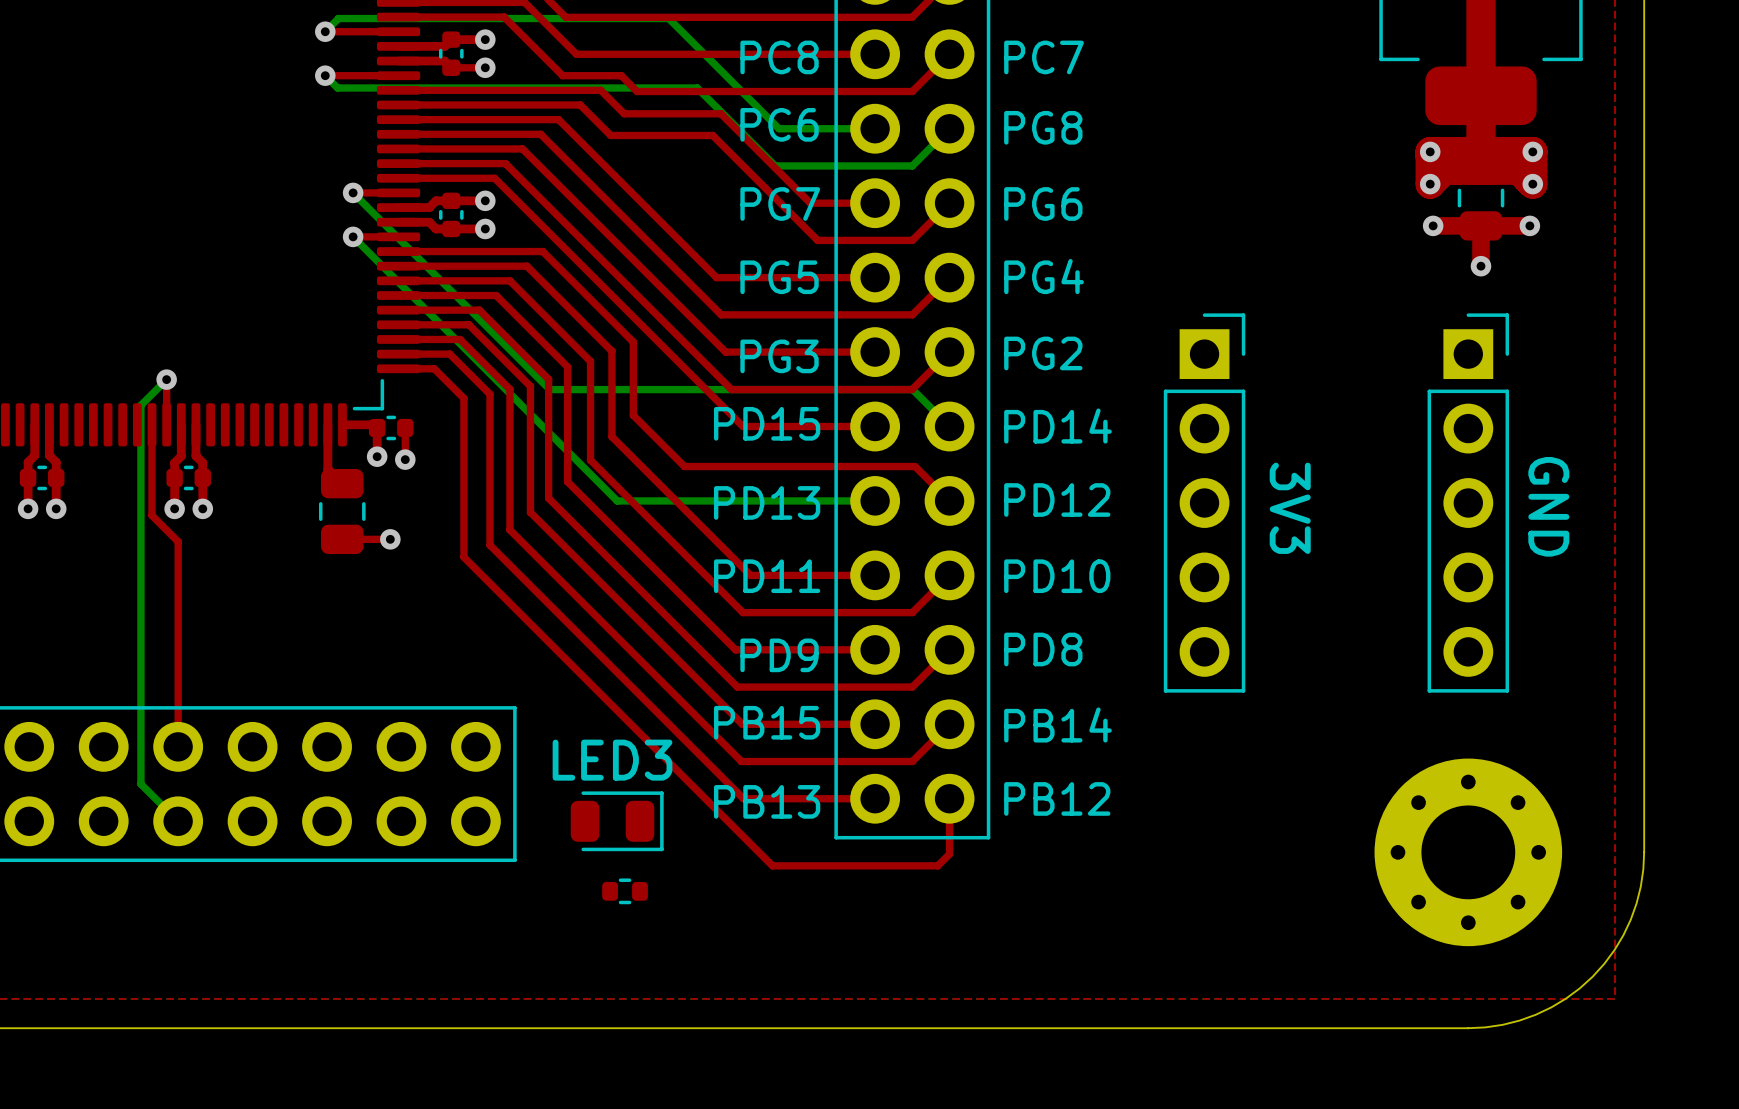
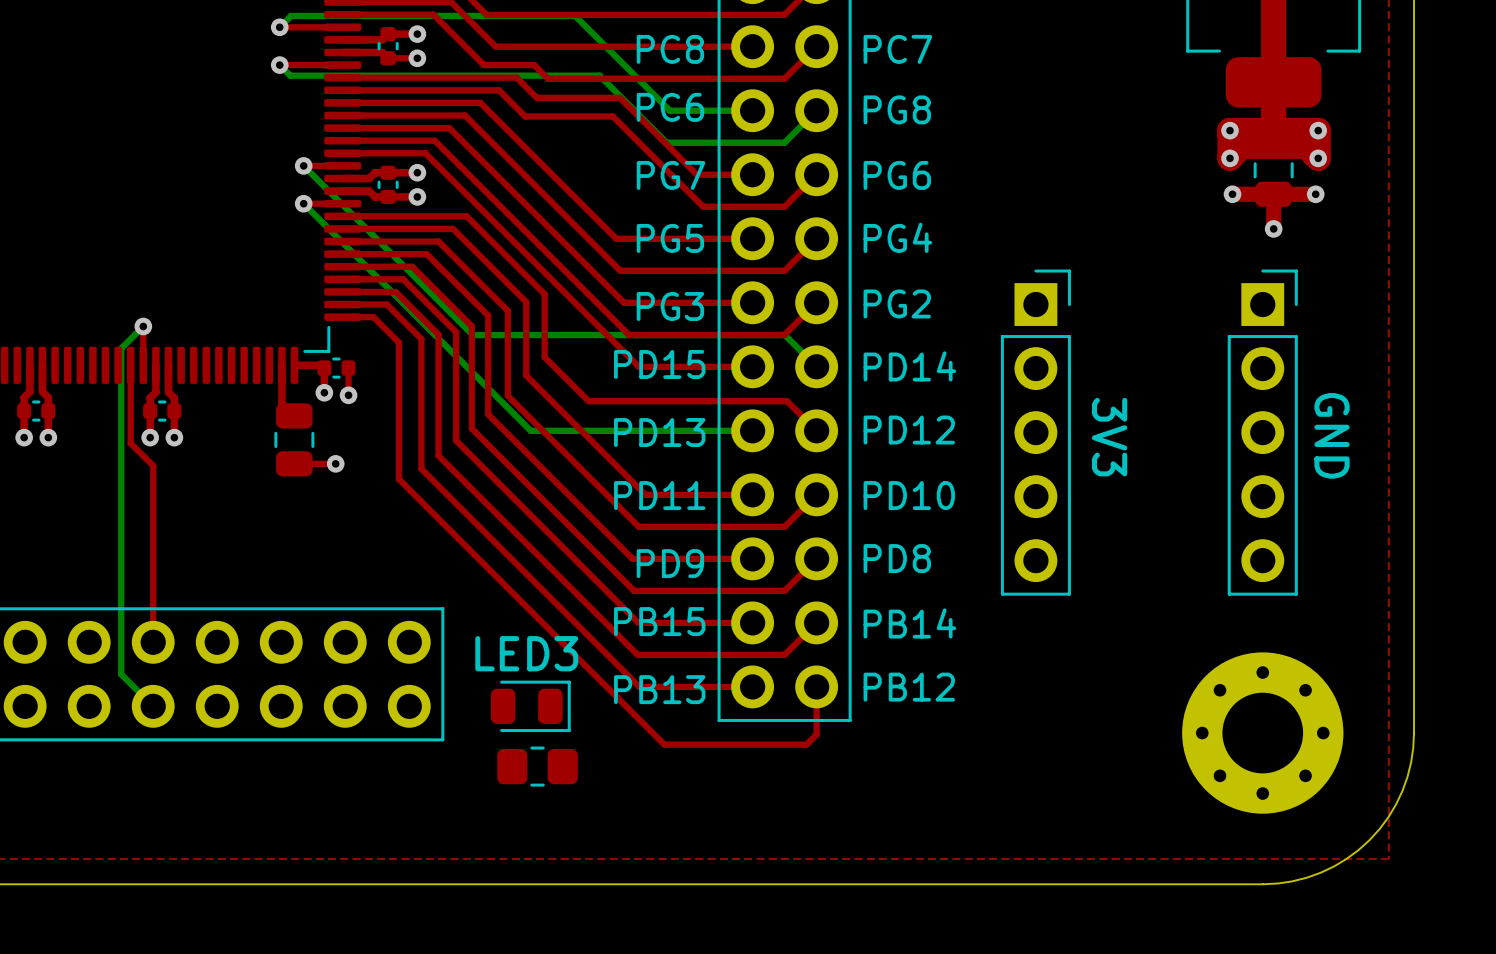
part footprint: [602, 878, 648, 905] -> [497, 746, 578, 787]

